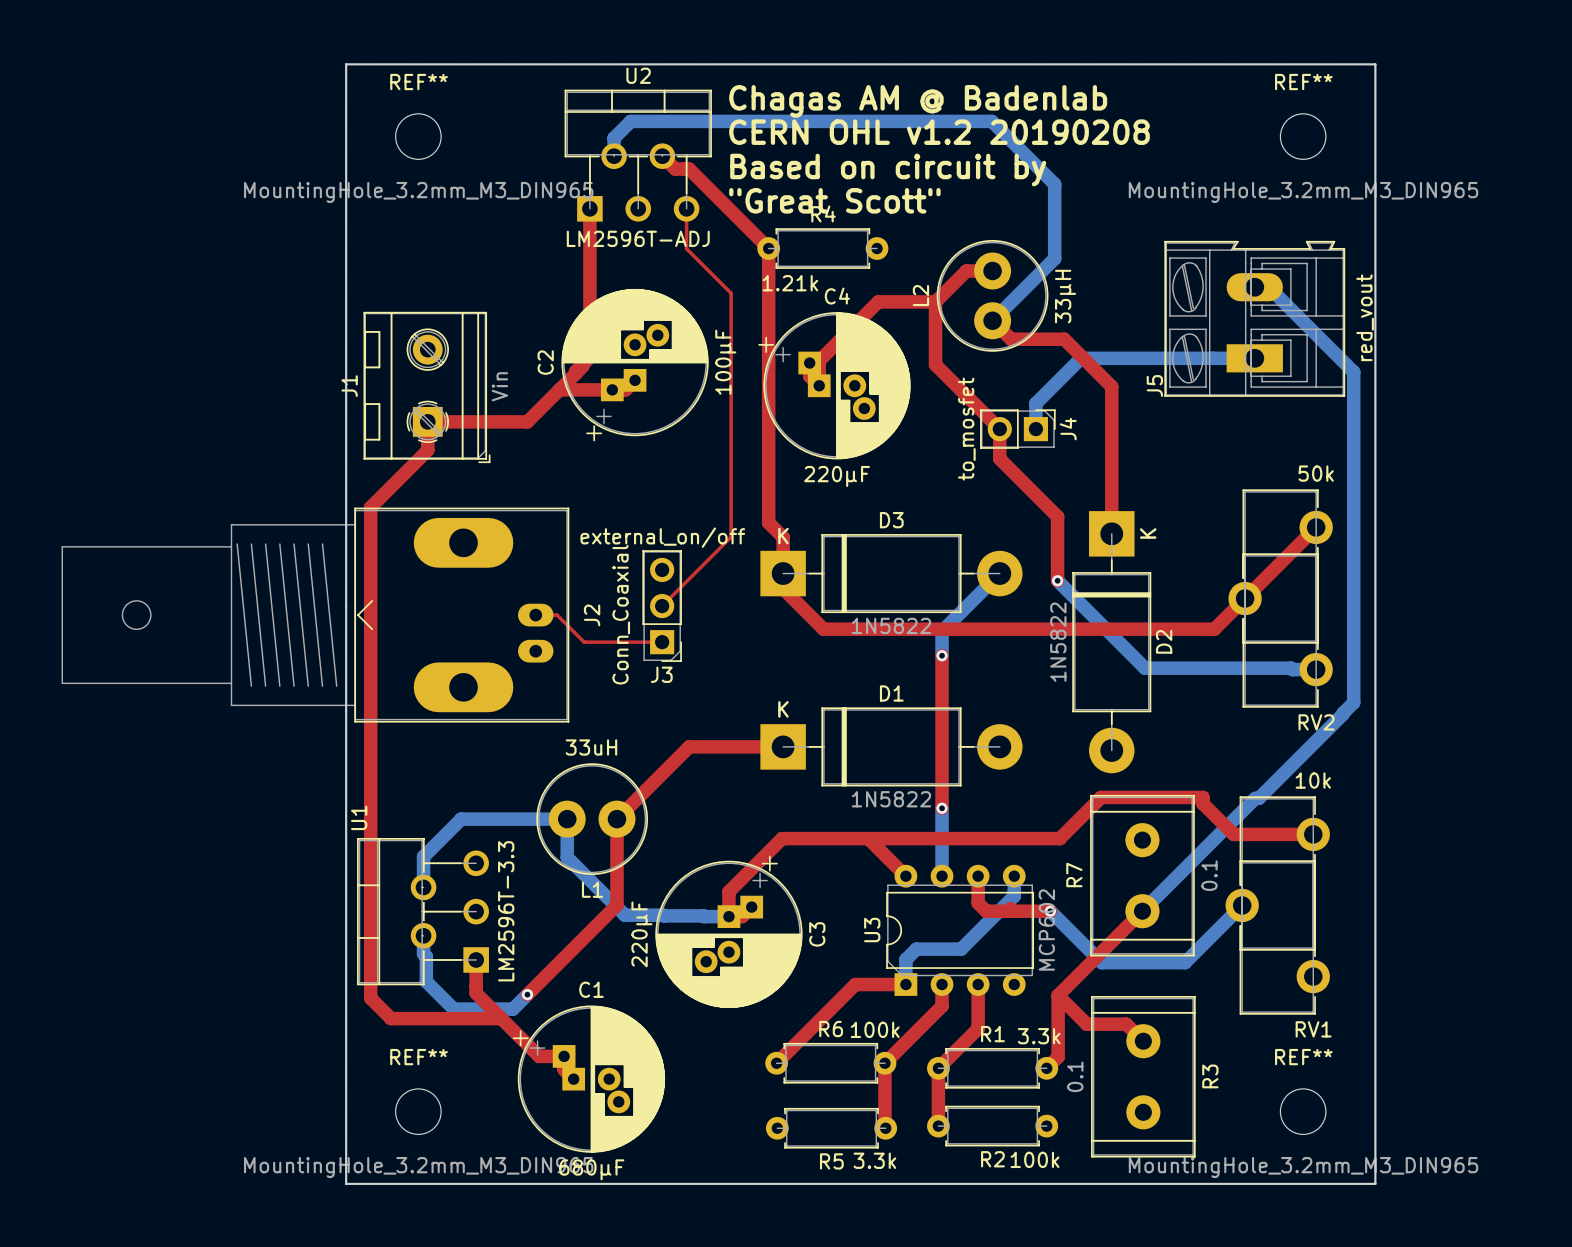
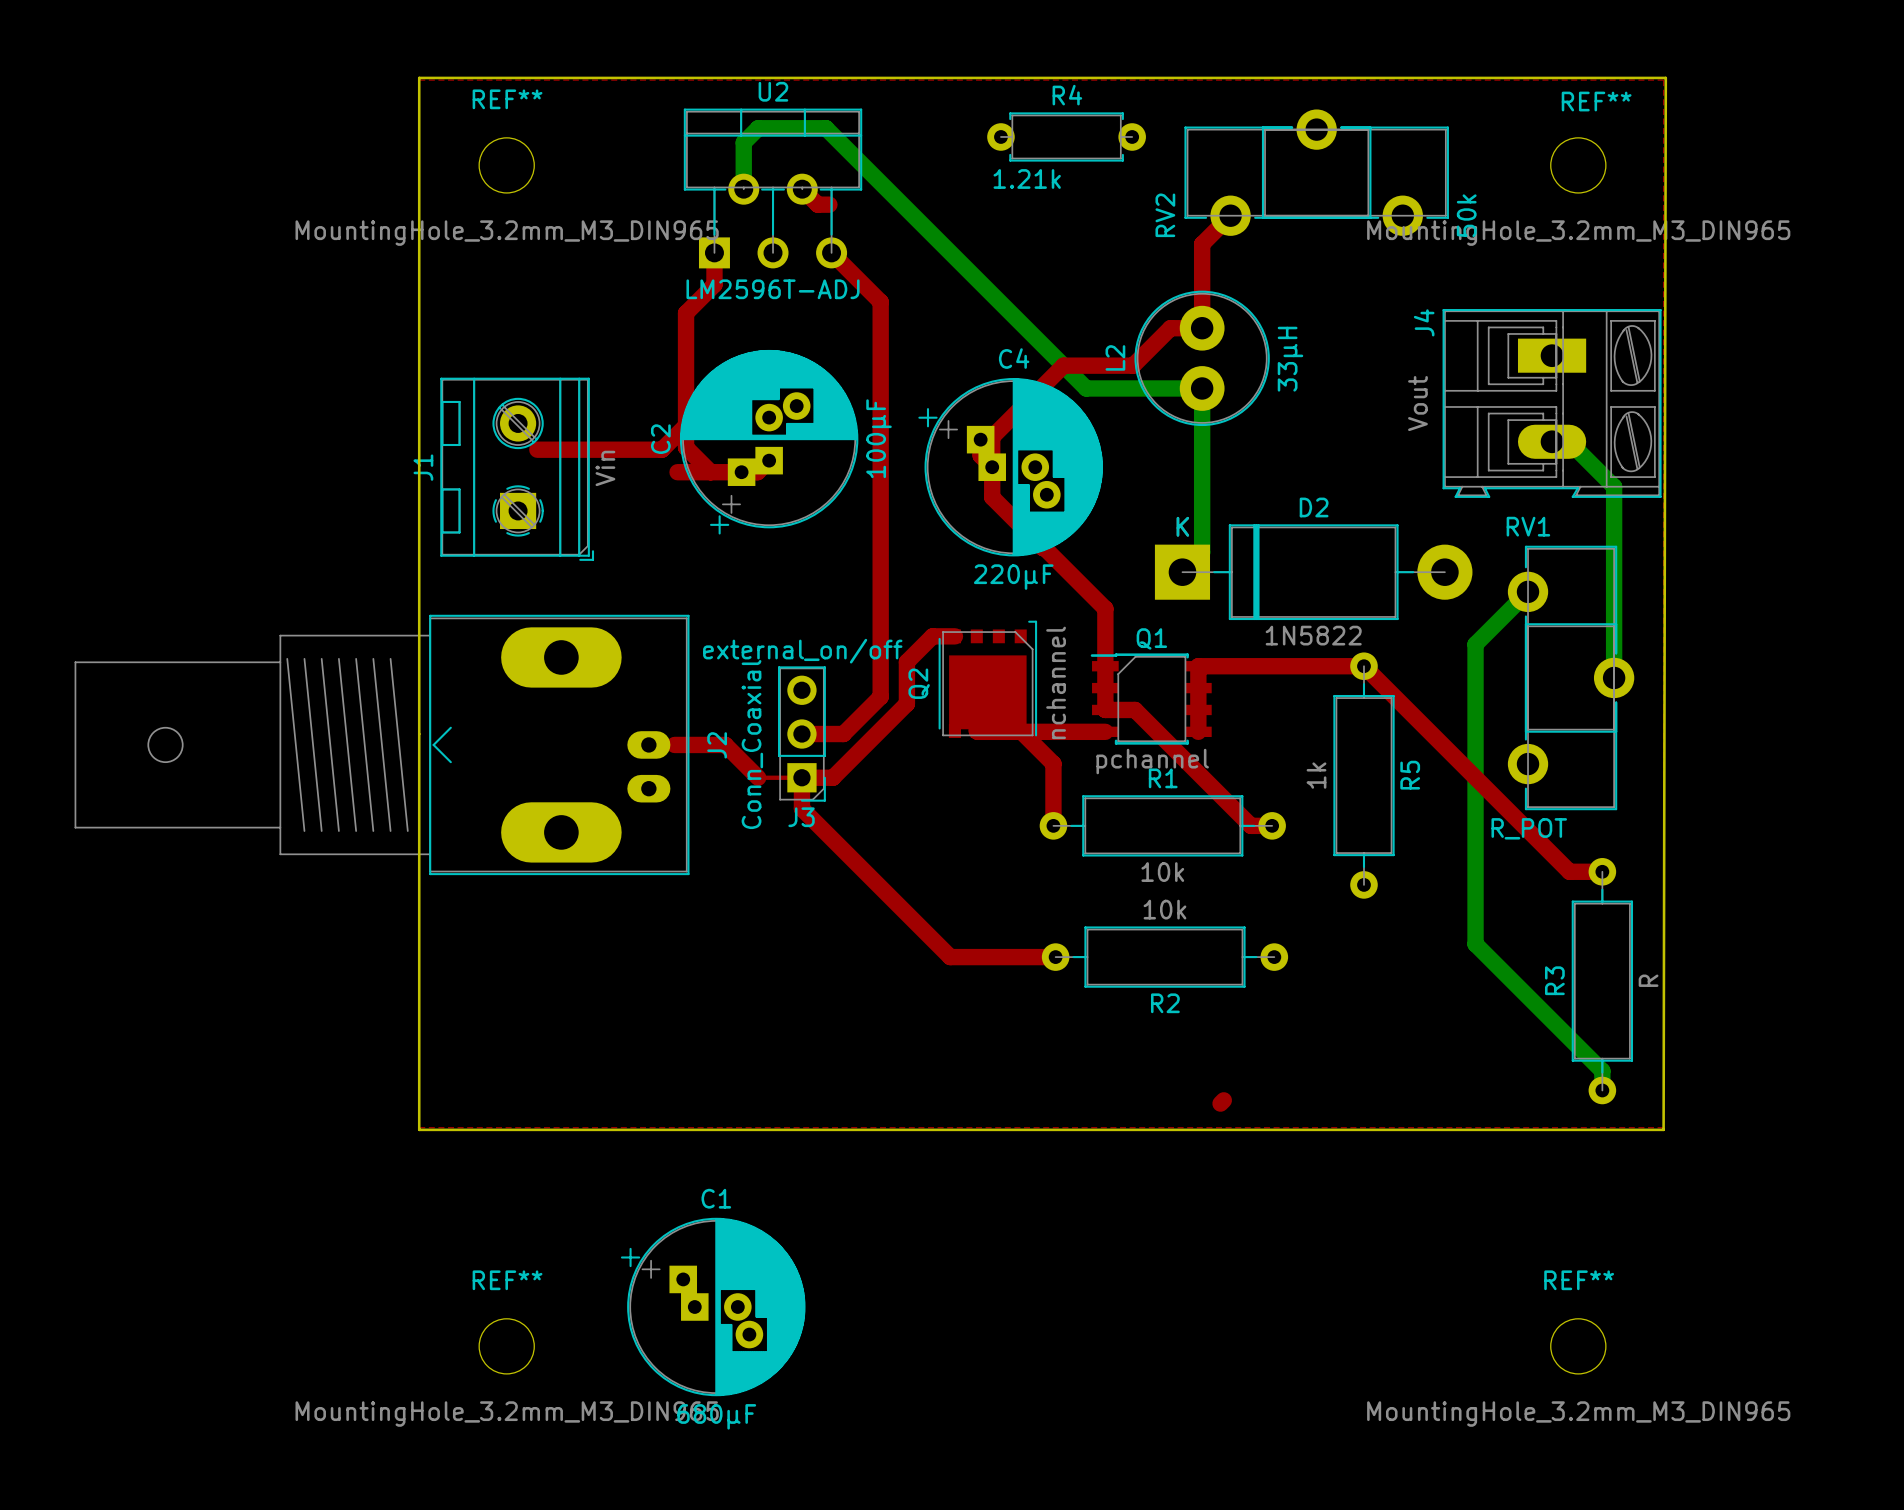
board edge: (1375, 64) (1375, 1183) (346, 1183) (346, 932) -> (1665, 77) (1663, 1129) (419, 1129)
top zone outline: none -> (419, 80) (1663, 80) (1663, 1127) (419, 1127) (419, 80)
REF** name position: REF** (1303, 82) -> REF** (1596, 101)
text: Chagas AM @ Badenlab (918, 101) -> none
text: CERN OHL v1.2 20190208 (939, 132) -> none
bottom track: (614, 138) (630, 121) (991, 121) (1054, 184) (1054, 258) (992, 320) -> (743, 167) (743, 142) (758, 128) (826, 128) (1086, 388) (1202, 388) (1202, 552) (1182, 572)
top track: (684, 169) (689, 169) (768, 248) (768, 522) (783, 537) (783, 588) (823, 629) (1214, 629) (1316, 527) -> none
text: Based on circuit by (888, 170) -> none
top track: none -> (1230, 215) (1202, 244) (1202, 328)
text: "Great Scott" (834, 200) -> none
top track: (686, 208) (686, 248) (731, 293) (731, 537) (662, 606) -> (831, 252) (880, 302) (880, 696) (843, 734) (801, 734)
top track: (589, 235) (589, 357) (575, 373) -> (714, 284) (686, 313) (686, 447) (710, 472)
R4 position: (822, 248) -> (1066, 136)
bottom track: (1254, 287) (1268, 287) (1353, 372) (1353, 702) (1258, 798) (1255, 798) (1142, 911) -> none
top track: (935, 301) (935, 364) (999, 429) (999, 458) (1057, 516) (1057, 580) -> none
J5: red_vout (1254, 318) -> none
top track: (992, 320) (1011, 339) (1064, 339) (1111, 386) (1111, 533) -> none
top track: none -> (686, 425) (661, 449) (537, 449)
bottom track: (1254, 358) (1081, 358) (1035, 403) (1035, 429) -> none
bottom track: none -> (1552, 441) (1569, 441) (1614, 486) (1614, 677)
top track: (583, 366) (527, 421) (427, 421) (427, 450) (370, 507) (370, 998) (391, 1018) (501, 1018) -> none
top track: none -> (992, 467) (992, 497) (1105, 608) (1105, 709) (1135, 709) (1250, 825) (1272, 825)
J4 footprint: [980, 409, 1056, 449] -> [1442, 309, 1662, 498]
J4 value: to_mosfet (966, 429) -> Vout (1417, 403)
J4 name position: J4 (1068, 429) -> J4 (1424, 322)
bottom track: none -> (1528, 591) (1475, 644) (1475, 944) (1602, 1071) (1602, 1090)
top track: none -> (954, 636) (932, 636) (906, 662) (906, 703) (832, 777) (801, 777) (801, 808) (950, 957) (1055, 957)
Q2: none -> nchannel (987, 679)
top track: none -> (987, 692) (976, 703) (977, 731) (1105, 731)
D3: 1N5822 (891, 573) -> none
bottom track: (999, 573) (942, 631) (942, 655) -> none
Q1: none -> pchannel (1151, 699)
bottom track: (1057, 580) (1144, 668) (1316, 669) -> none
via: (1057, 580) -> none
RV2 rotation: 0° (1280, 598) -> 90° clockwise (1316, 172)
RV2 position: (1280, 598) -> (1316, 172)
top track: none -> (1020, 731) (1053, 763) (1053, 825)
top track: none -> (1198, 731) (1198, 666) (1363, 666) (1569, 871) (1602, 871)
top track: (557, 615) (584, 642) (626, 642) -> (674, 744) (725, 744) (758, 777)
D2 rotation: 0° (1111, 642) -> 90° counterclockwise (1313, 572)
D2 position: (1111, 642) -> (1313, 572)
top track: (942, 655) (942, 808) -> none
via: (942, 655) -> none
top track: (783, 746) (689, 746) (617, 819) (617, 905) (527, 994) -> none
D1: 1N5822 (891, 746) -> none
RV1 value: 10k (1313, 780) -> R_POT (1529, 828)
RV1 footprint: [1225, 796, 1330, 1015] -> [1507, 545, 1635, 811]
bottom track: (942, 808) (942, 876) -> none
via: (942, 808) -> none
L1: 33uH (592, 819) -> none
top track: (1313, 834) (1233, 834) (1202, 803) (1202, 797) (1101, 797) (1059, 838) (782, 838) (728, 891) (728, 916) (742, 916) (751, 907) -> none
top track: (868, 838) (905, 876) -> none
R7: 0.1 (1142, 875) -> none
top track: (978, 876) (978, 903) (986, 911) (1050, 911) -> none
bottom track: (1014, 876) (1014, 896) (961, 949) (916, 949) (905, 959) (905, 984) -> none
bottom track: (423, 887) (423, 856) (461, 819) (567, 819) (567, 857) (624, 915) (728, 916) -> none
bottom track: (1242, 905) (1185, 962) (1101, 962) (1050, 911) -> none
U1: LM2596T-3.3 (422, 911) -> none
via: (1050, 911) -> none
top track: (1142, 911) (1058, 995) -> none
U3: MCP602 (960, 930) -> none
C3: 220µF (728, 931) -> none
bottom track: (423, 935) (423, 953) (426, 956) (426, 981) (453, 1009) (513, 1009) (527, 994) -> none
top track: (476, 959) (476, 993) (539, 1056) (564, 1056) (564, 1069) (573, 1079) -> none
top track: (905, 984) (855, 984) (776, 1063) -> none
top track: (942, 984) (942, 1006) (884, 1063) (885, 1128) -> none
top track: (978, 984) (978, 1028) (938, 1068) (938, 1126) -> none
via: (527, 994) -> none
top track: (1058, 995) (1058, 1056) (1046, 1068) -> none
top track: (1058, 995) (1086, 1024) (1126, 1024) (1143, 1041) -> none
R3 footprint: [1091, 996, 1196, 1158] -> [1571, 858, 1634, 1105]
RV1 name position: RV1 (1313, 1029) -> RV1 (1528, 526)
R1 value: 3.3k (1039, 1036) -> 10k (1162, 872)
R1 footprint: [927, 1047, 1059, 1089] -> [1039, 795, 1286, 857]
R6: 100k (830, 1063) -> none
R3 value: 0.1 (1075, 1076) -> R (1648, 980)
R3 name position: R3 (1210, 1076) -> R3 (1554, 980)
R2 footprint: [927, 1105, 1059, 1147] -> [1041, 926, 1289, 988]
R5 footprint: [765, 1107, 898, 1149] -> [1333, 652, 1395, 899]
R2 value: 100k (1035, 1159) -> 10k (1164, 909)
R5 value: 3.3k (874, 1160) -> 1k (1316, 775)
R5 name position: R5 (831, 1161) -> R5 (1410, 775)

